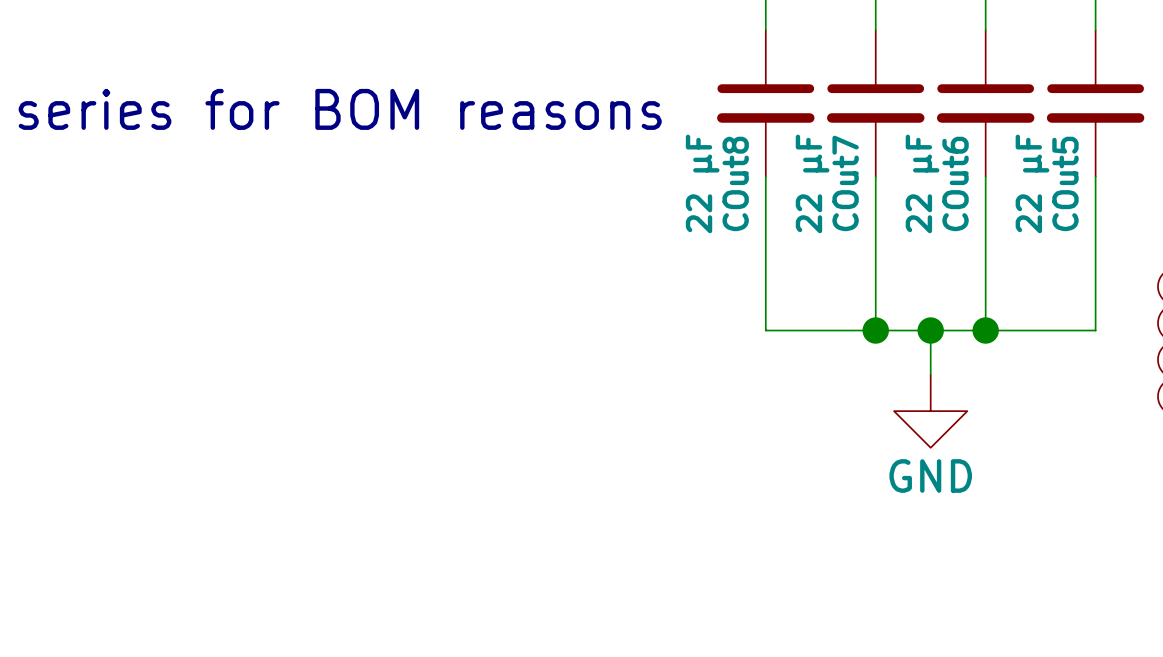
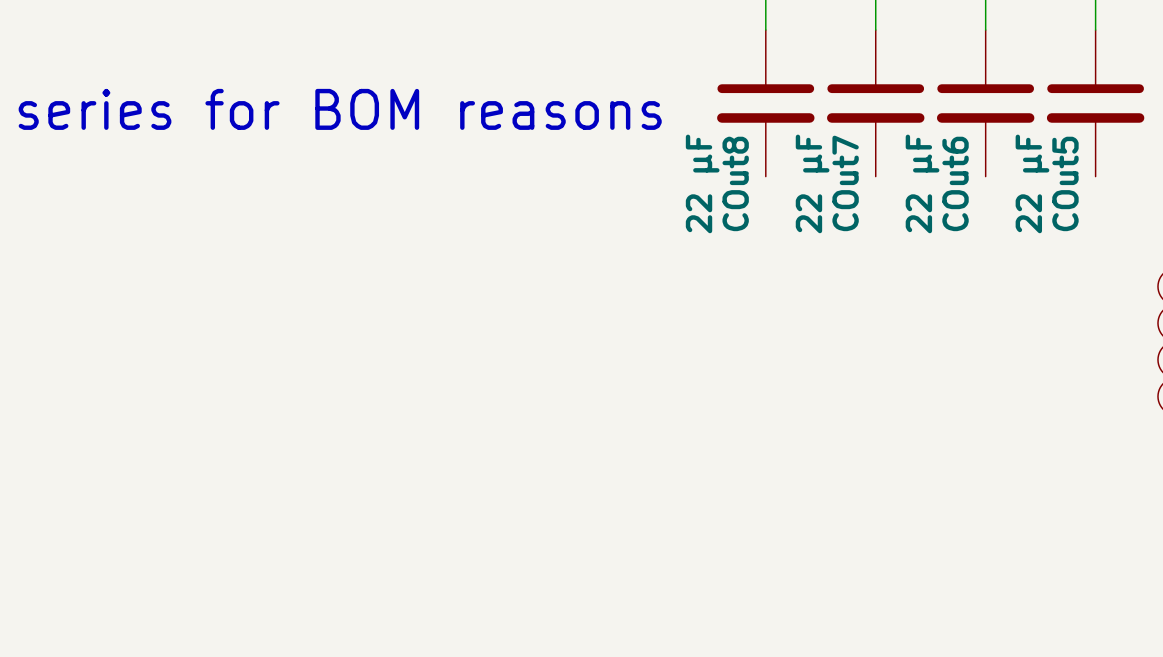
wire: (765, 176) (765, 330) (1095, 330) (1095, 176) -> none
wire: (875, 176) (875, 330) -> none
wire: (985, 176) (985, 330) -> none
junction: (875, 330) -> none
wire: (930, 330) (930, 374) -> none
junction: (930, 330) -> none
junction: (985, 330) -> none
power symbol: GND (930, 411) -> none

